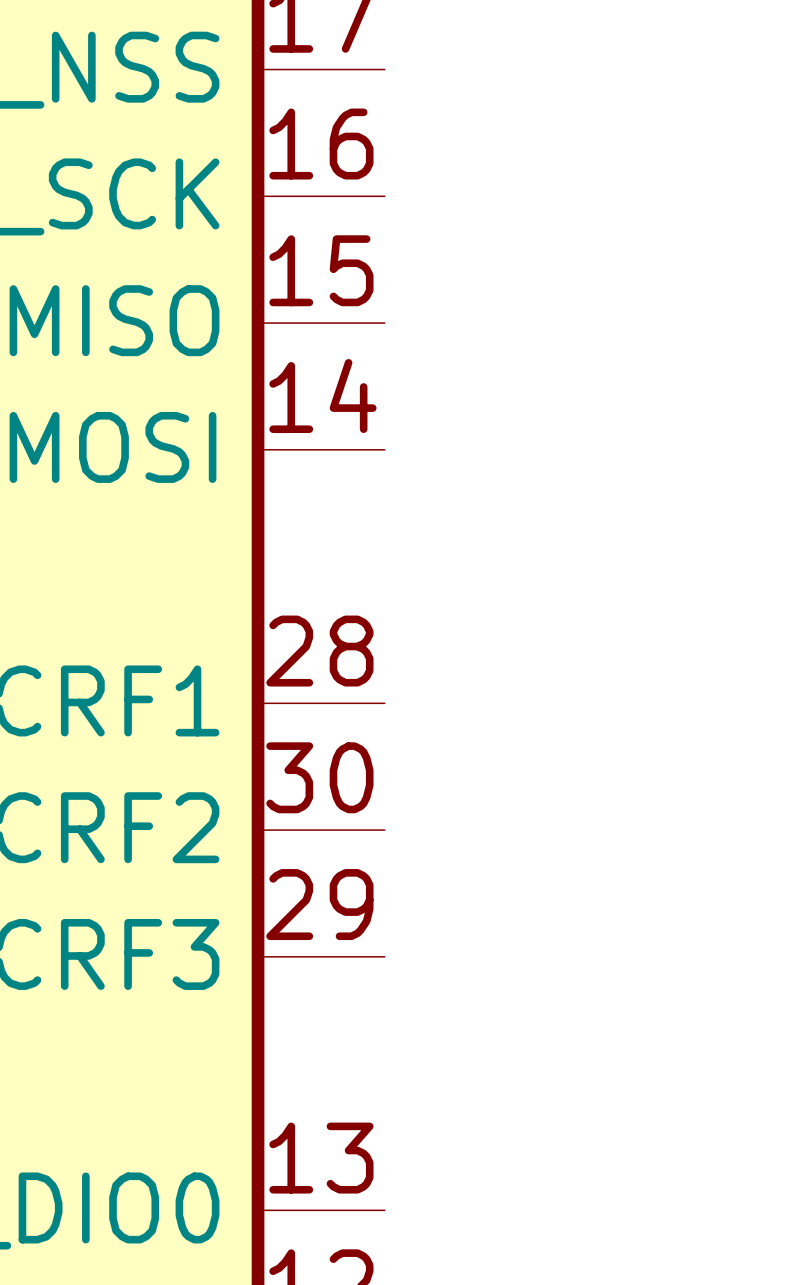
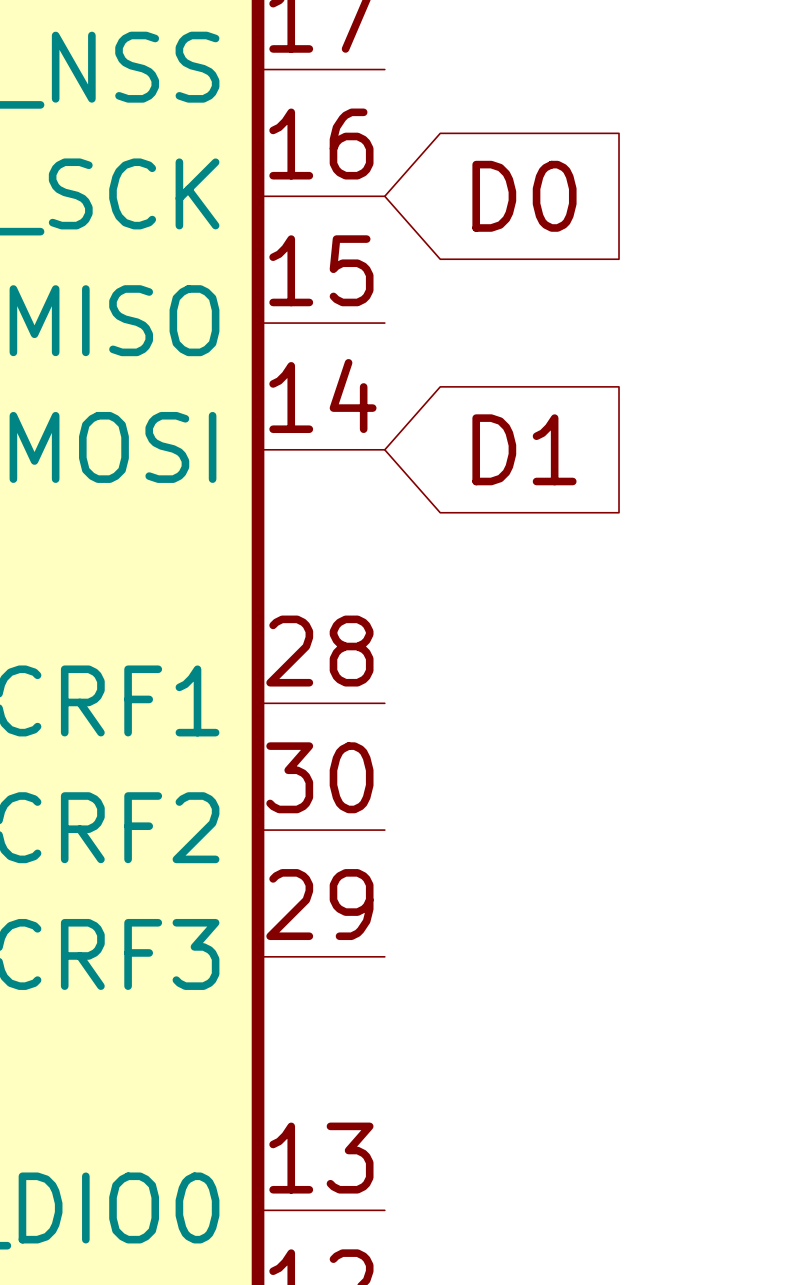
global label: none -> D0 (524, 196)
global label: none -> D1 (524, 449)

